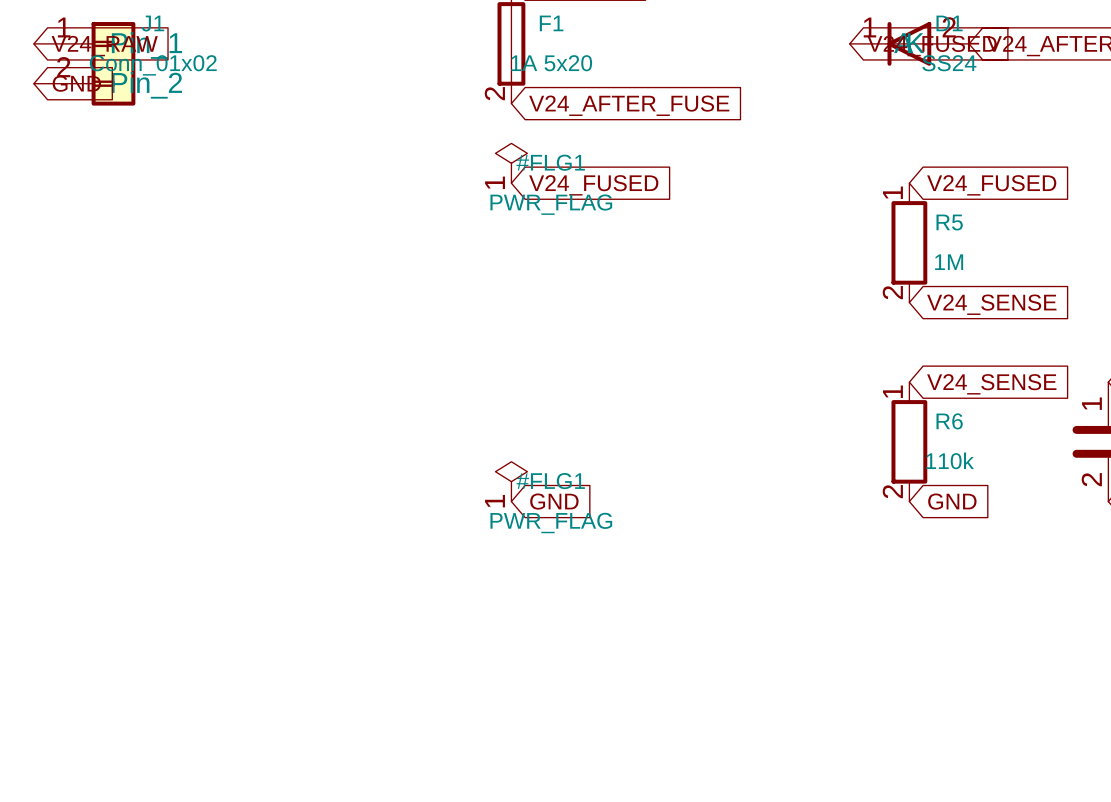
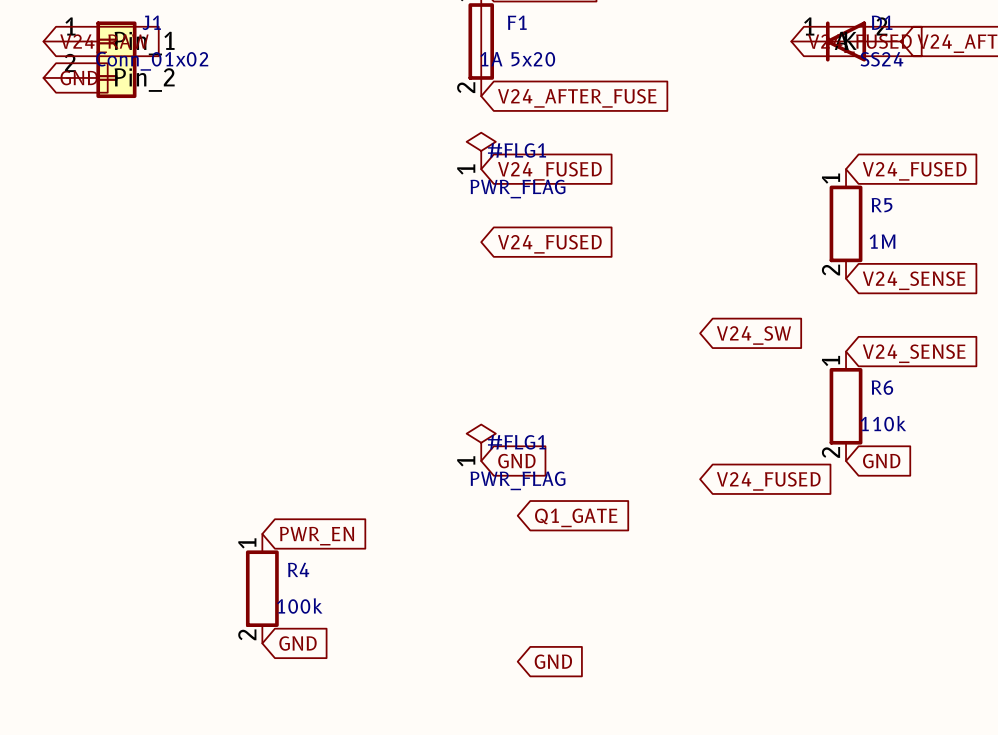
global label: none -> V24_FUSED (549, 244)
global label: none -> V24_SW (753, 335)
global label: none -> V24_FUSED (768, 481)
global label: none -> Q1_GATE (576, 517)
global label: none -> PWR_EN (317, 536)
R4: none -> 100k (262, 588)
global label: none -> GND (298, 643)
global label: none -> GND (553, 661)

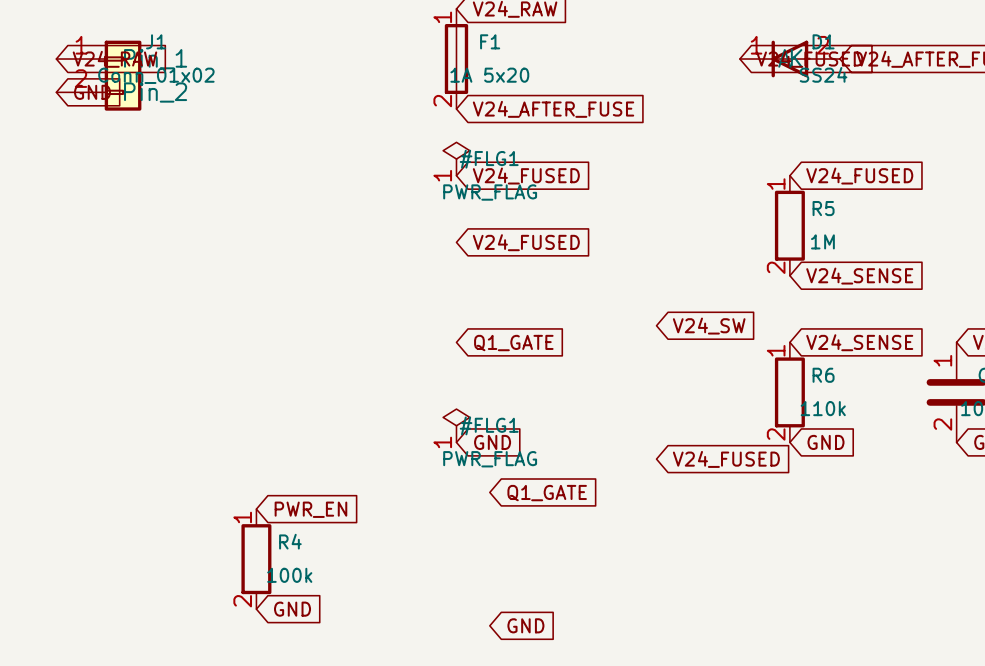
global label: none -> Q1_GATE (513, 343)

